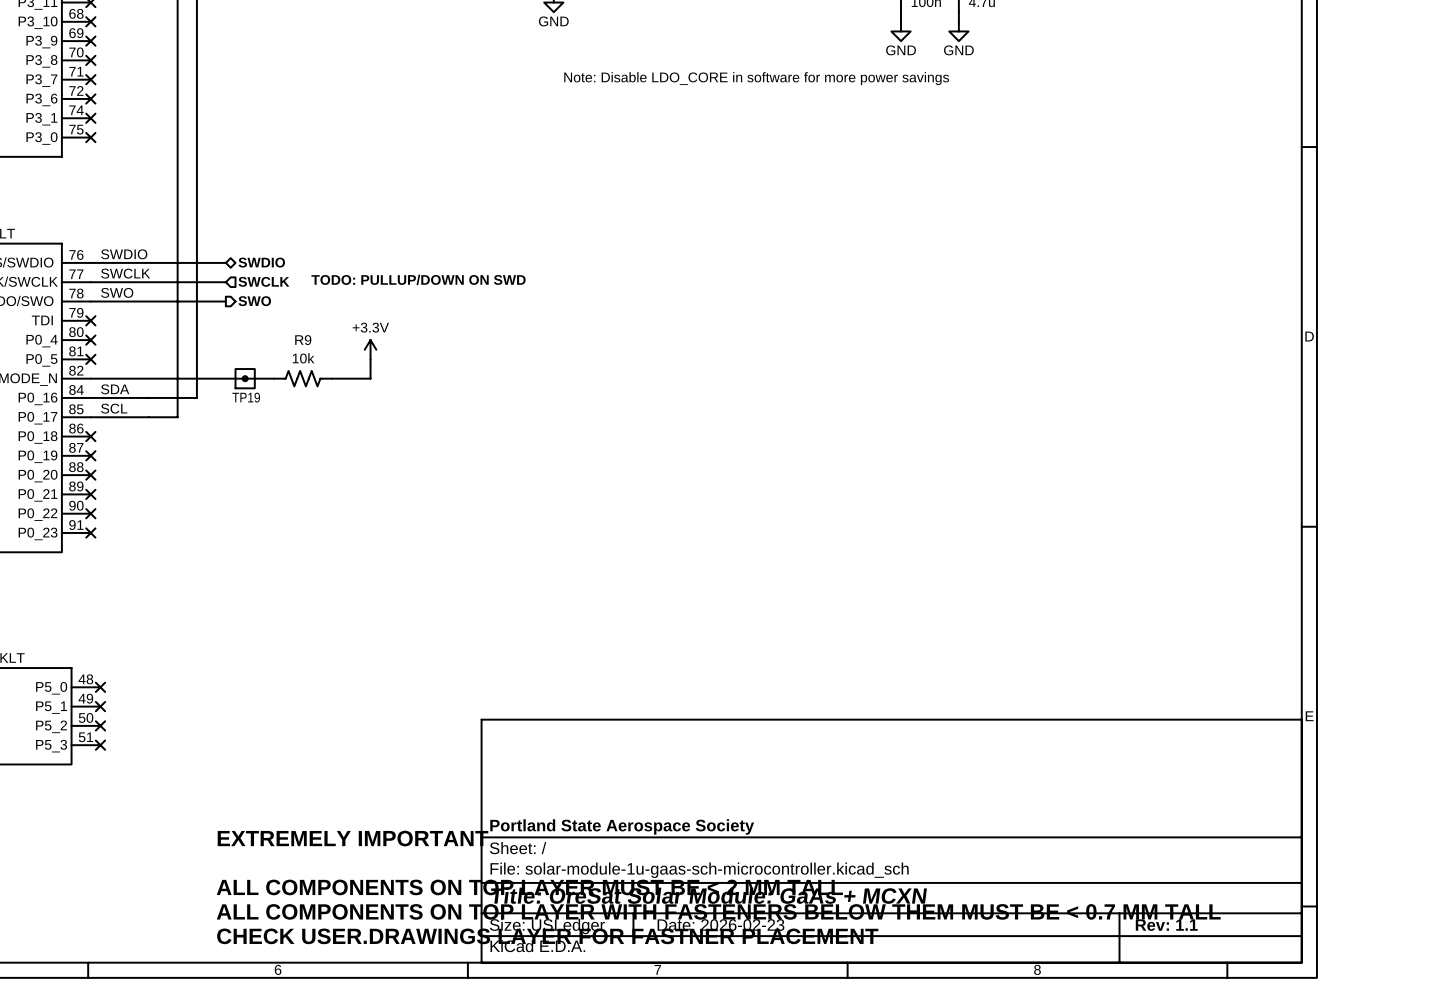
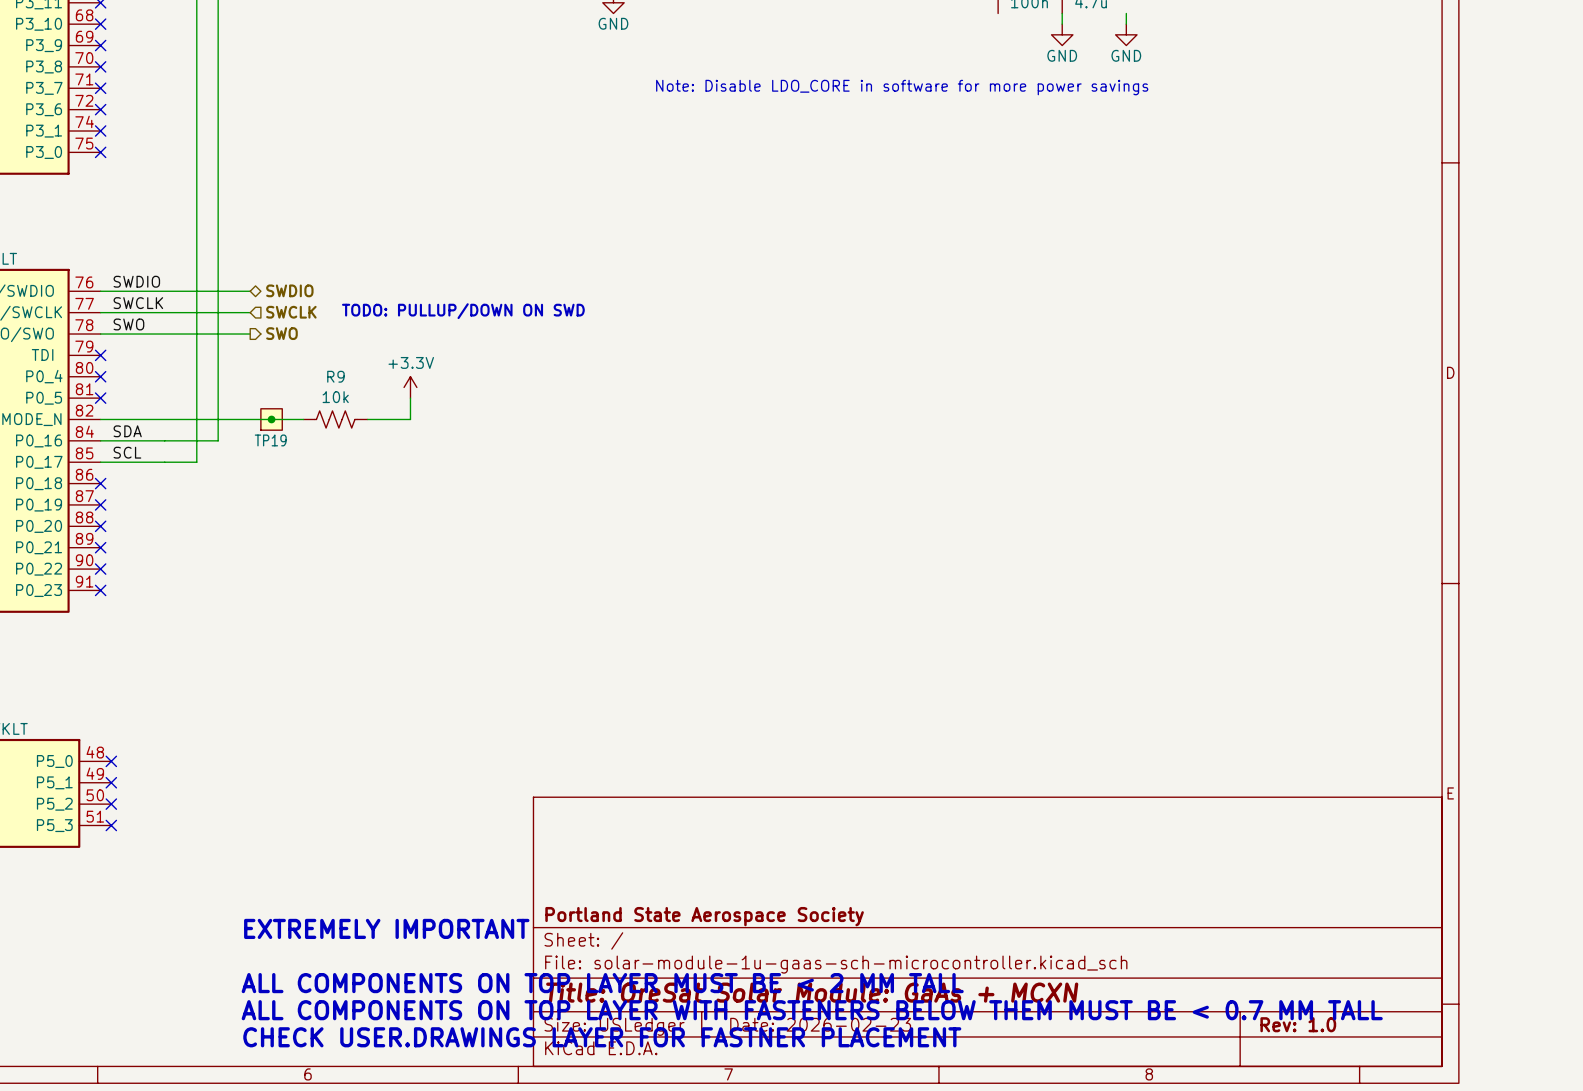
wire: (901, 12) (901, 21) -> (1126, 13) (1126, 24)
power symbol position: GND (901, 31) -> GND (1126, 34)
text position: Note: Disable LDO_CORE in software for more power savings (756, 78) -> Note: Disable LDO_CORE in software for more power savings (902, 87)
title block: Rev: 1.1 (1166, 925) -> Rev: 1.0 (1298, 1024)

